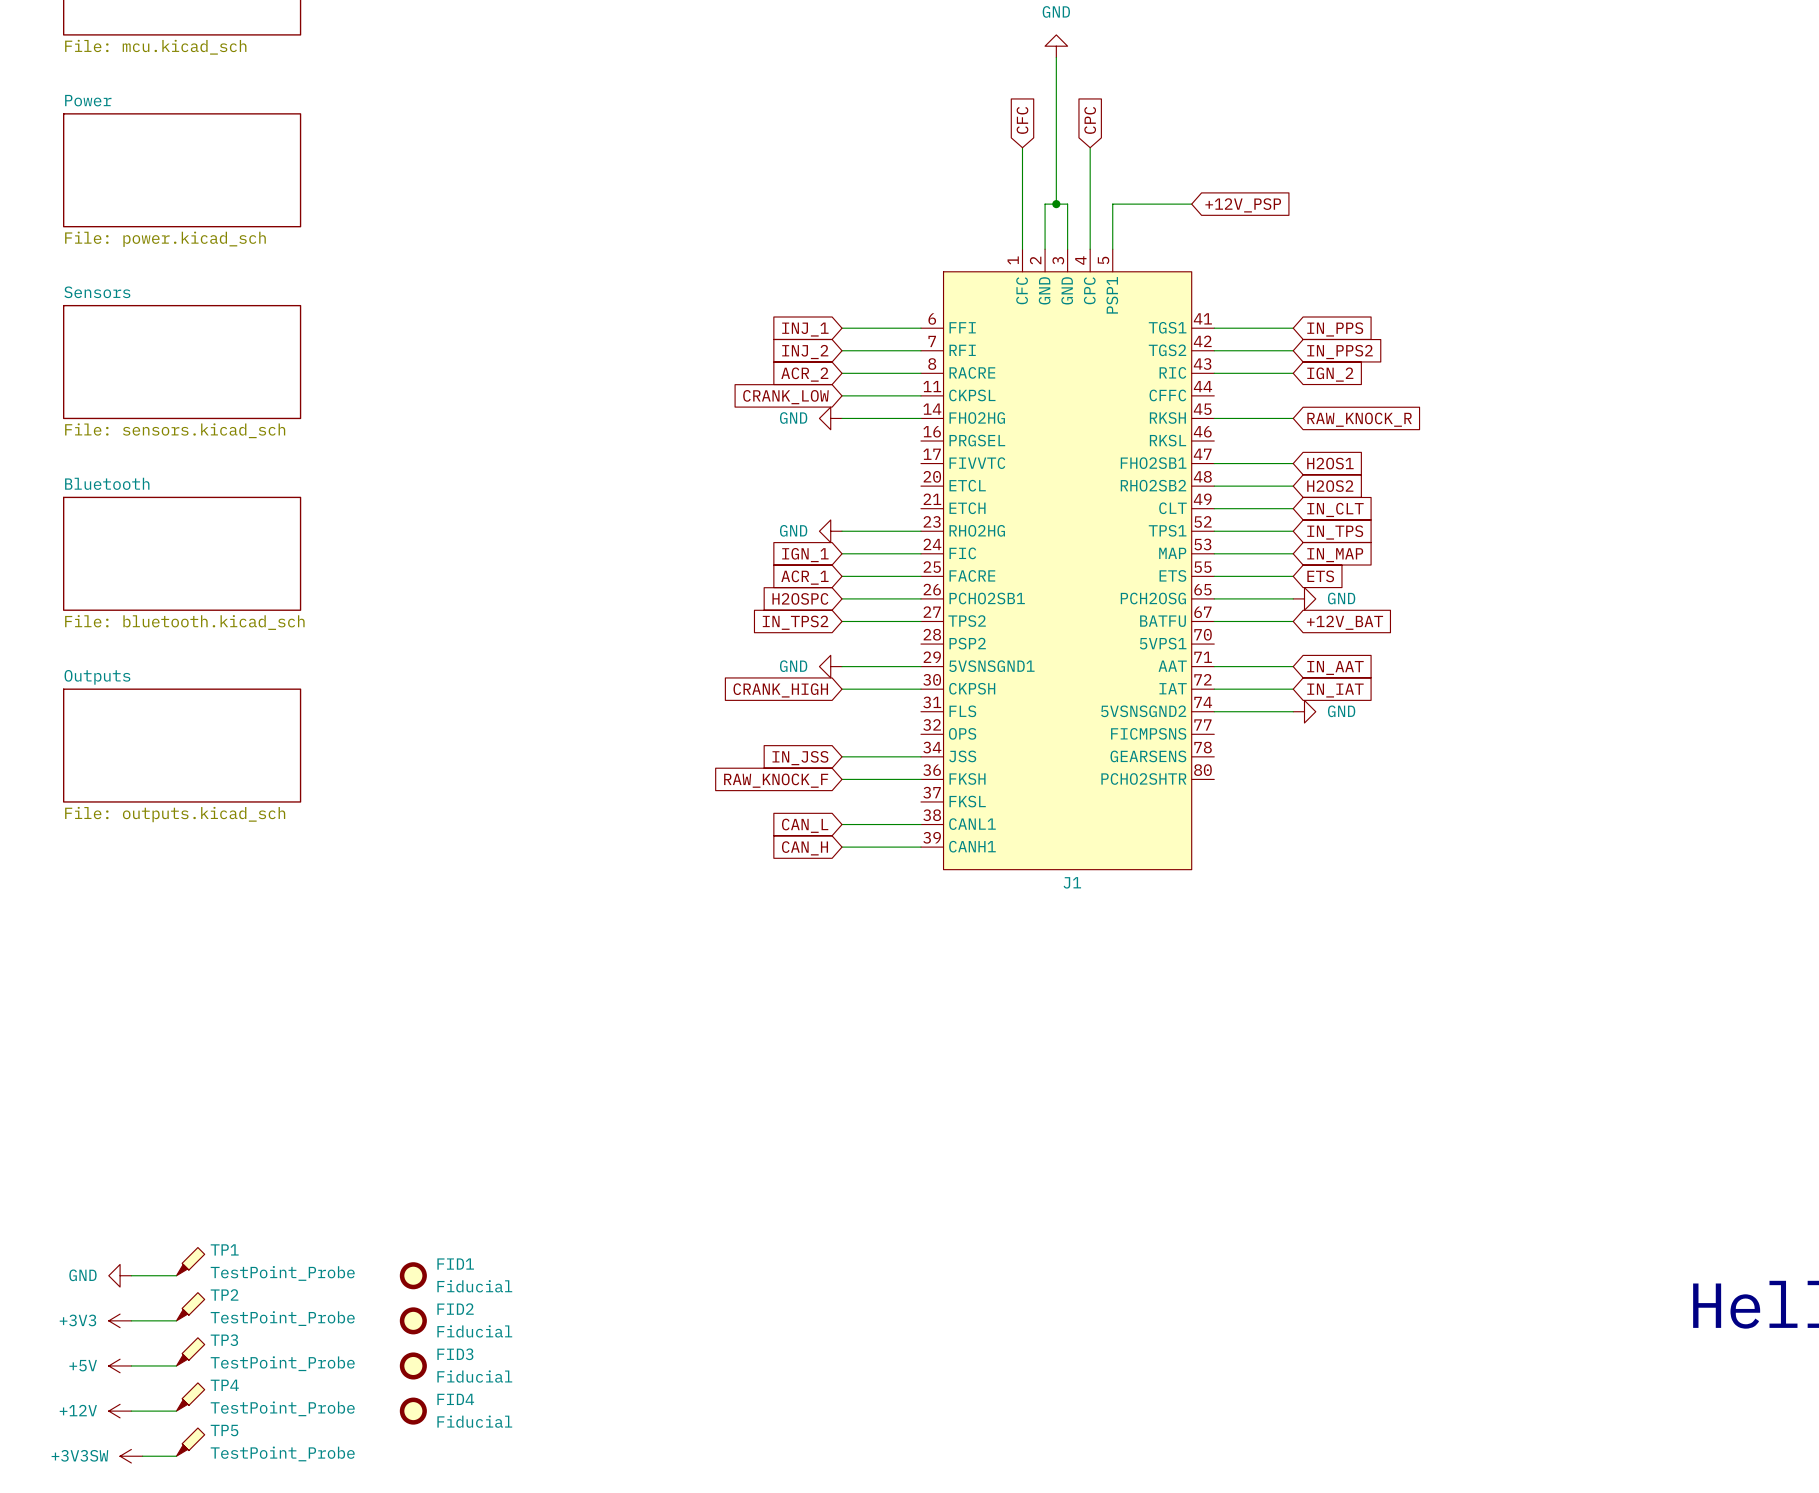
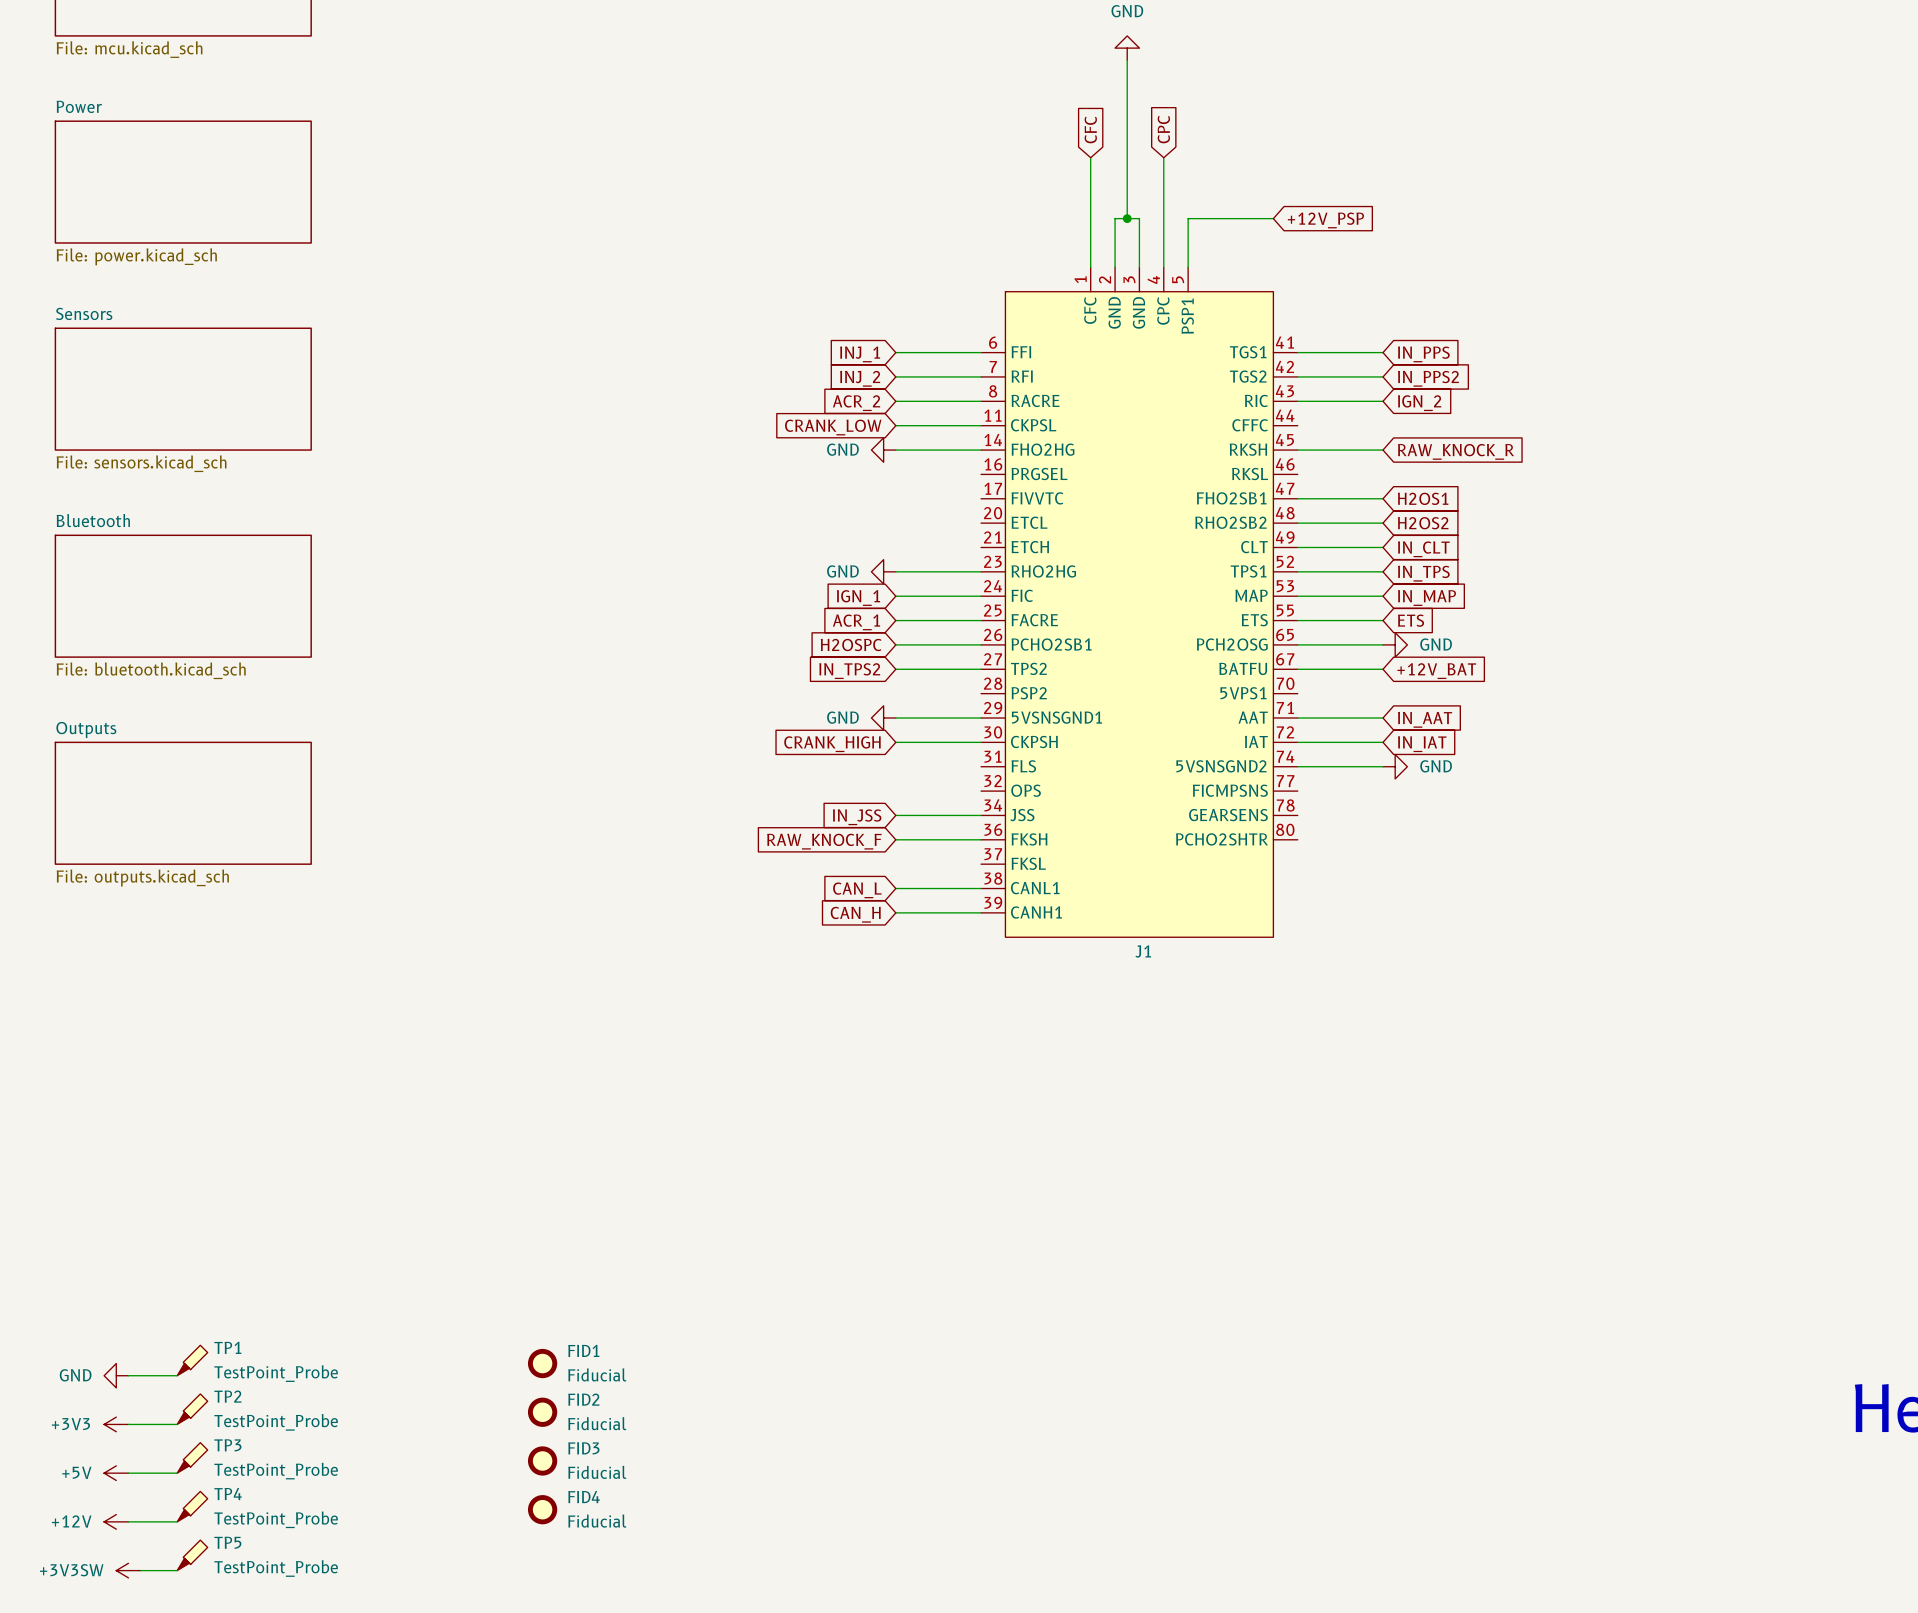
FID1 position: (413, 1275) -> (542, 1363)
FID2 position: (413, 1320) -> (542, 1412)
FID3 position: (413, 1365) -> (542, 1460)
FID4 position: (413, 1411) -> (542, 1509)

